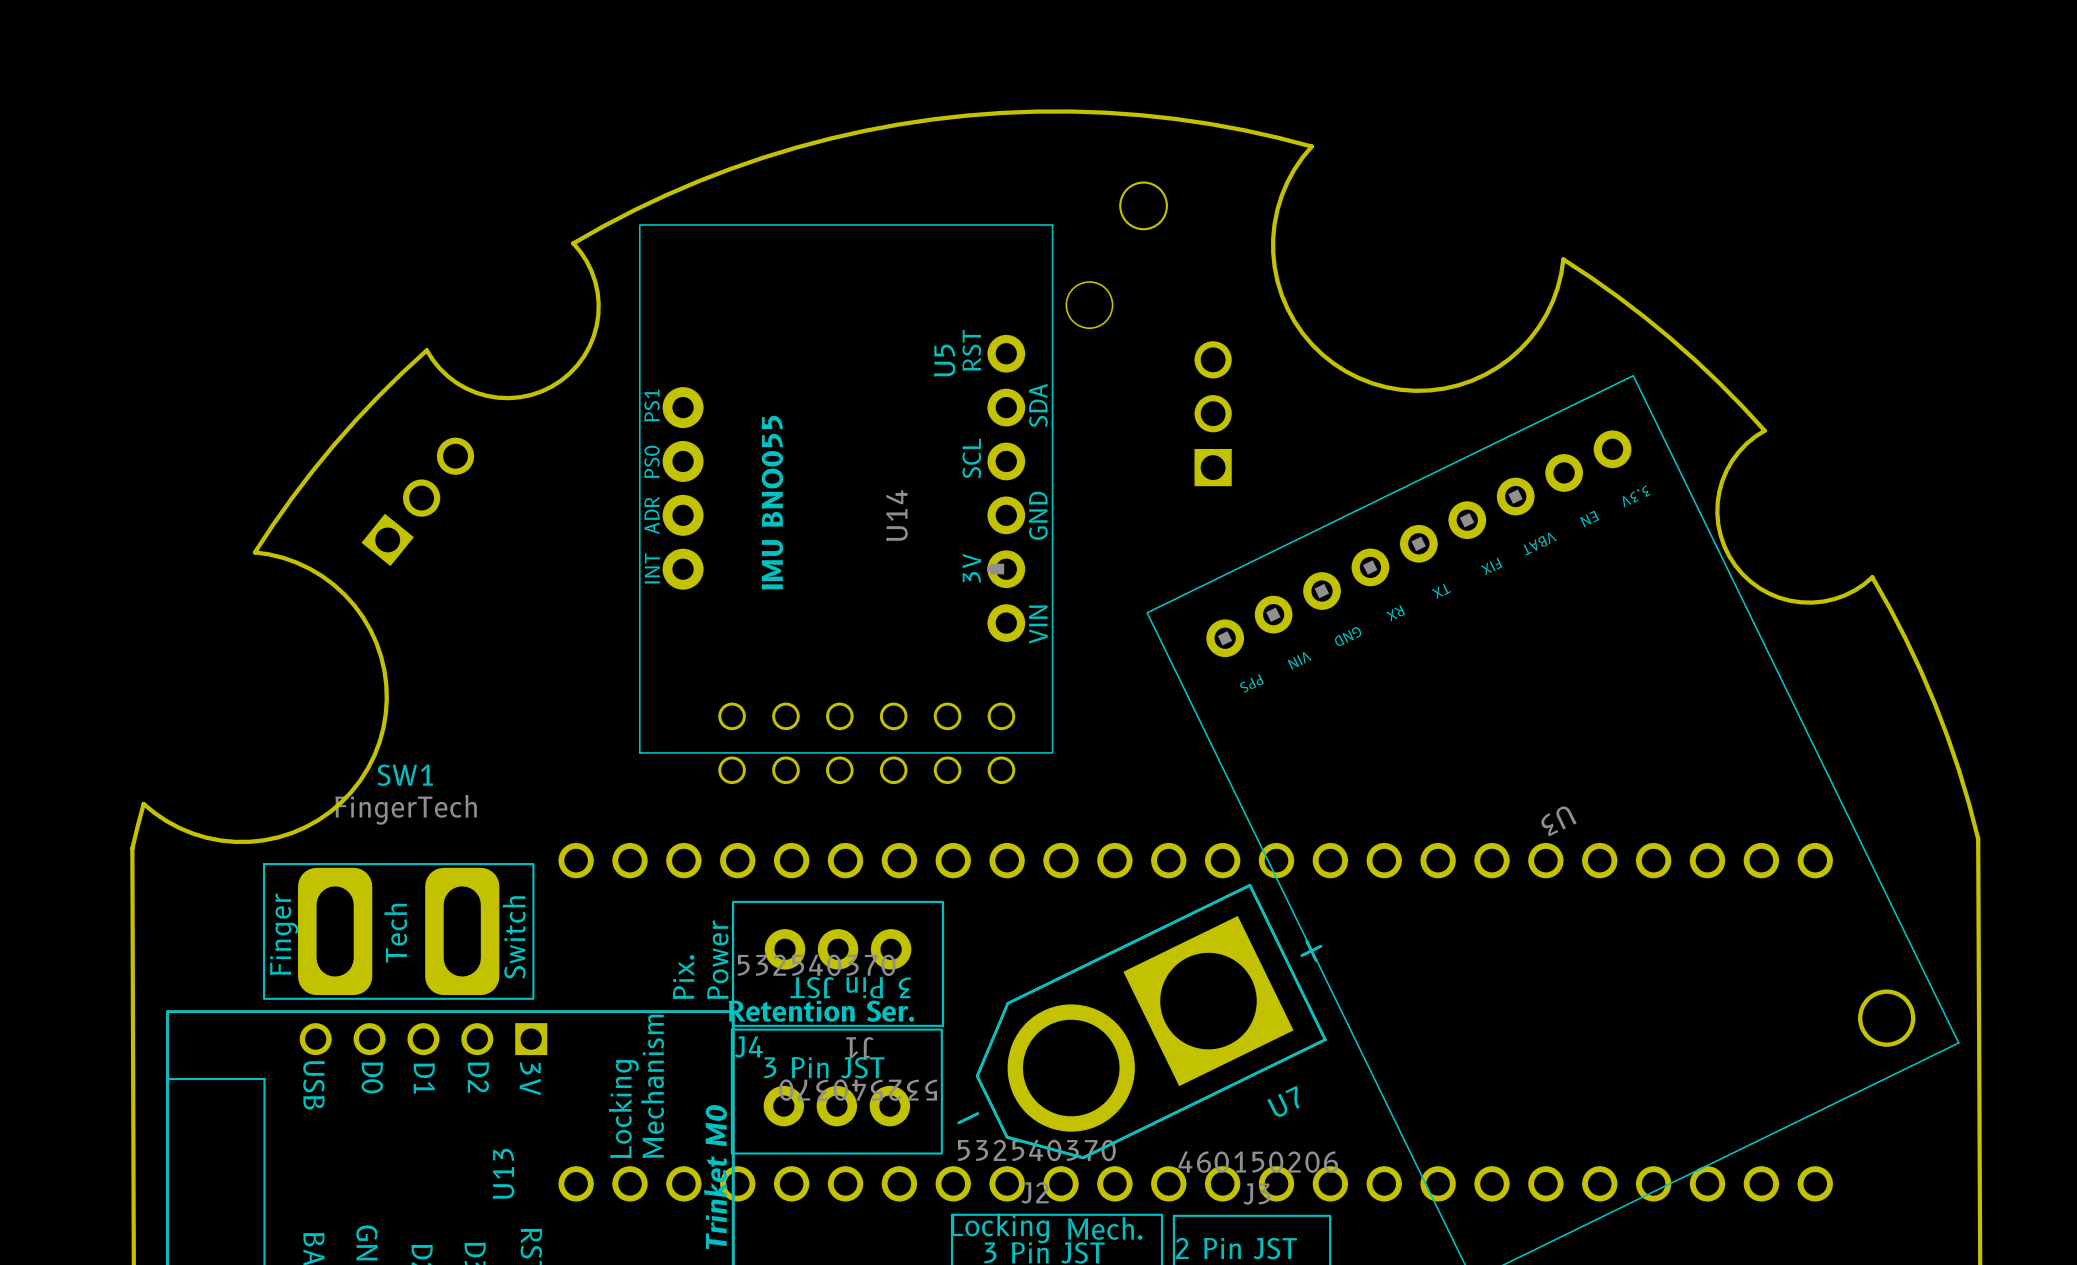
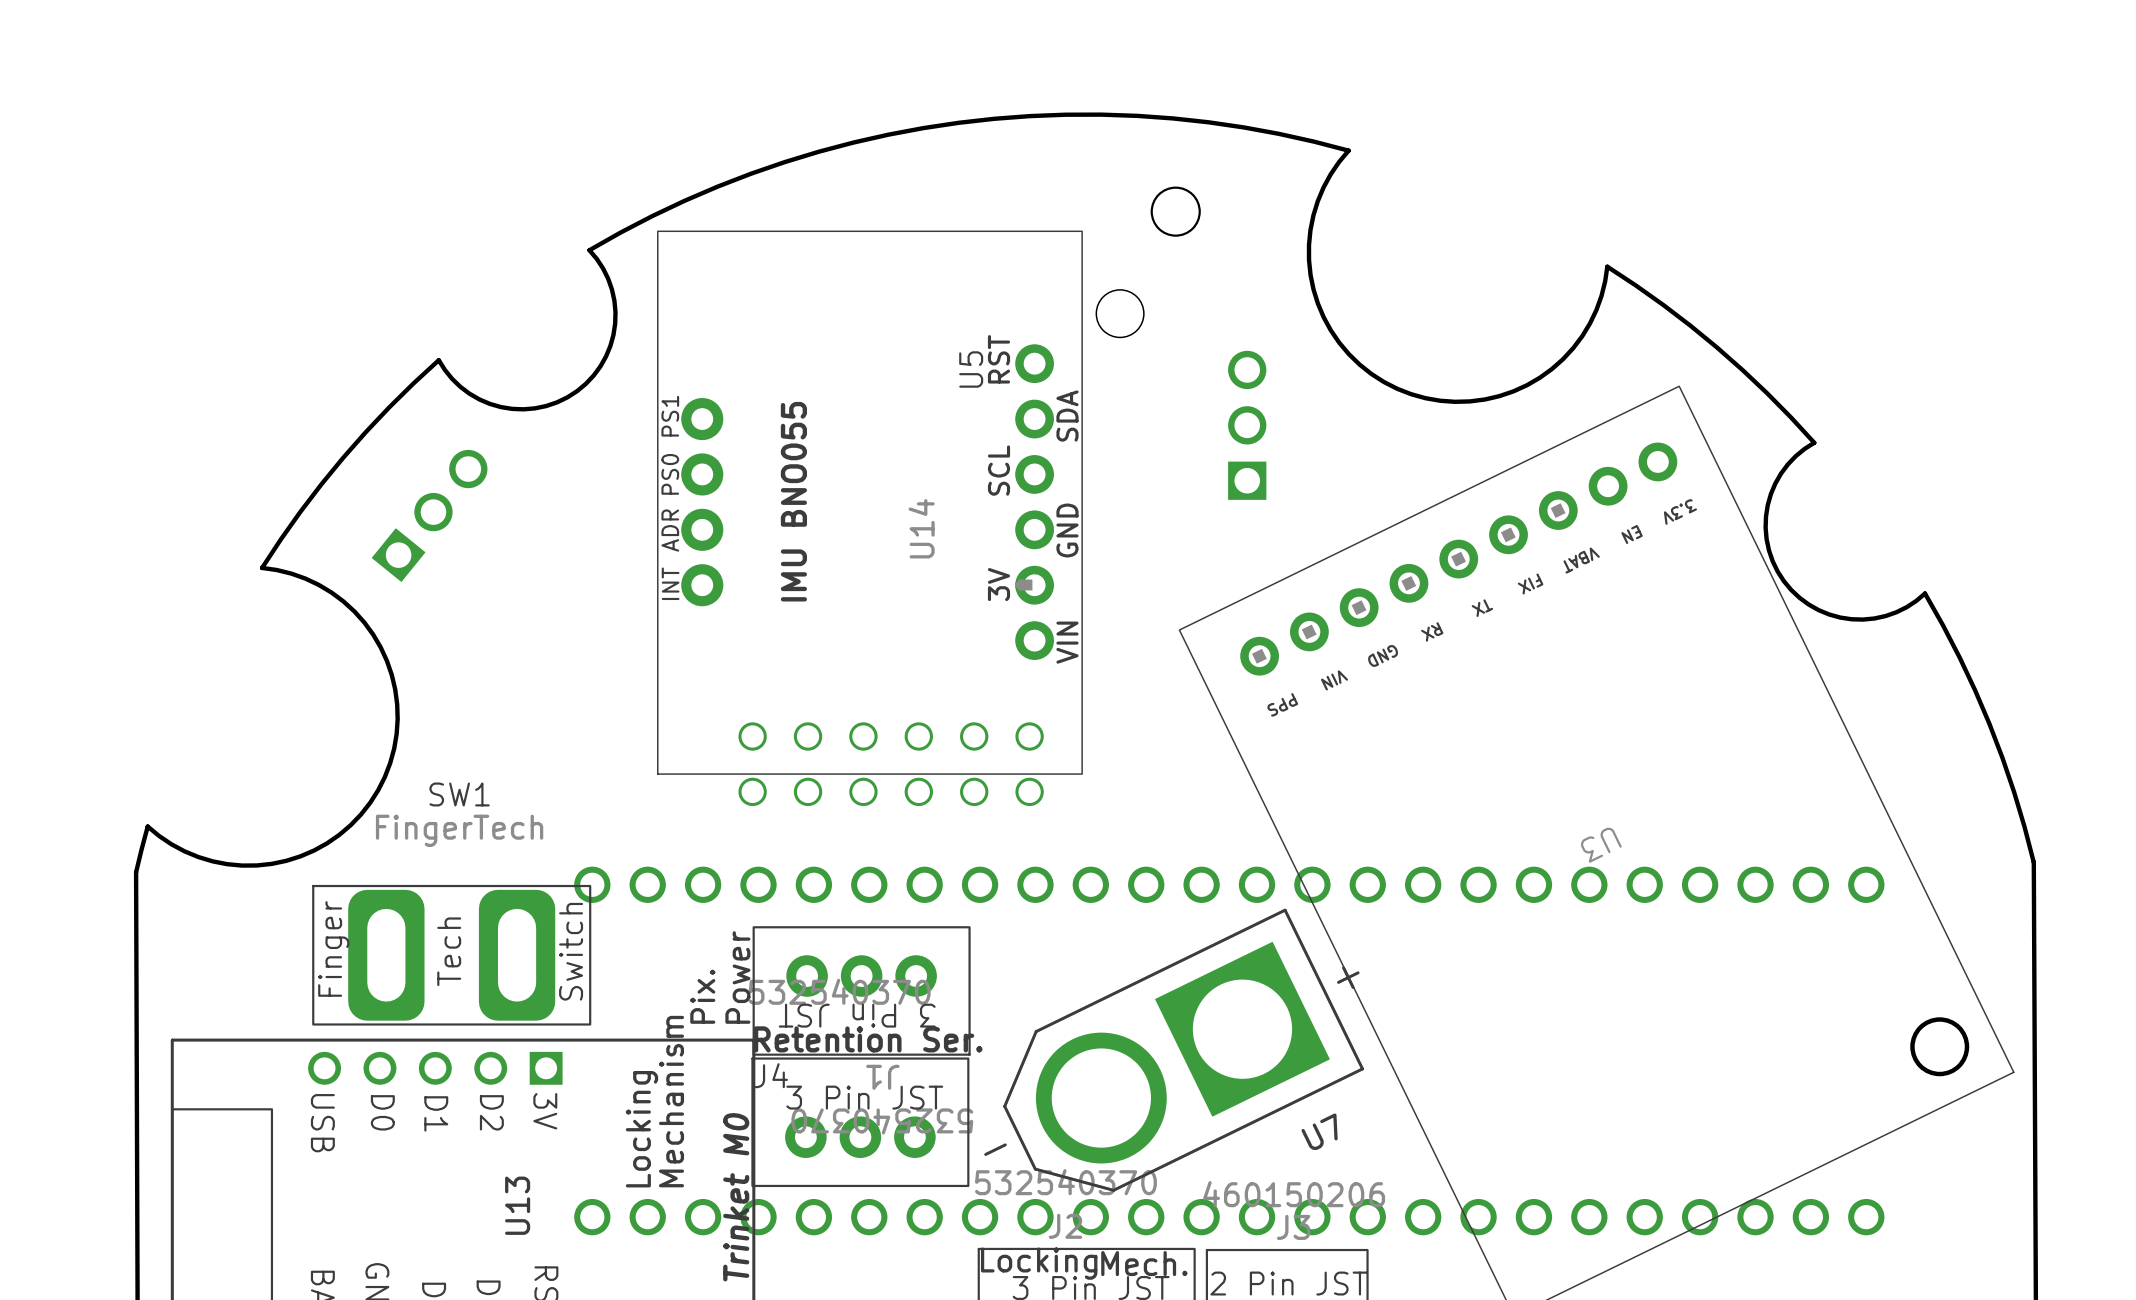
SW1 position: (398, 931) -> (451, 955)

